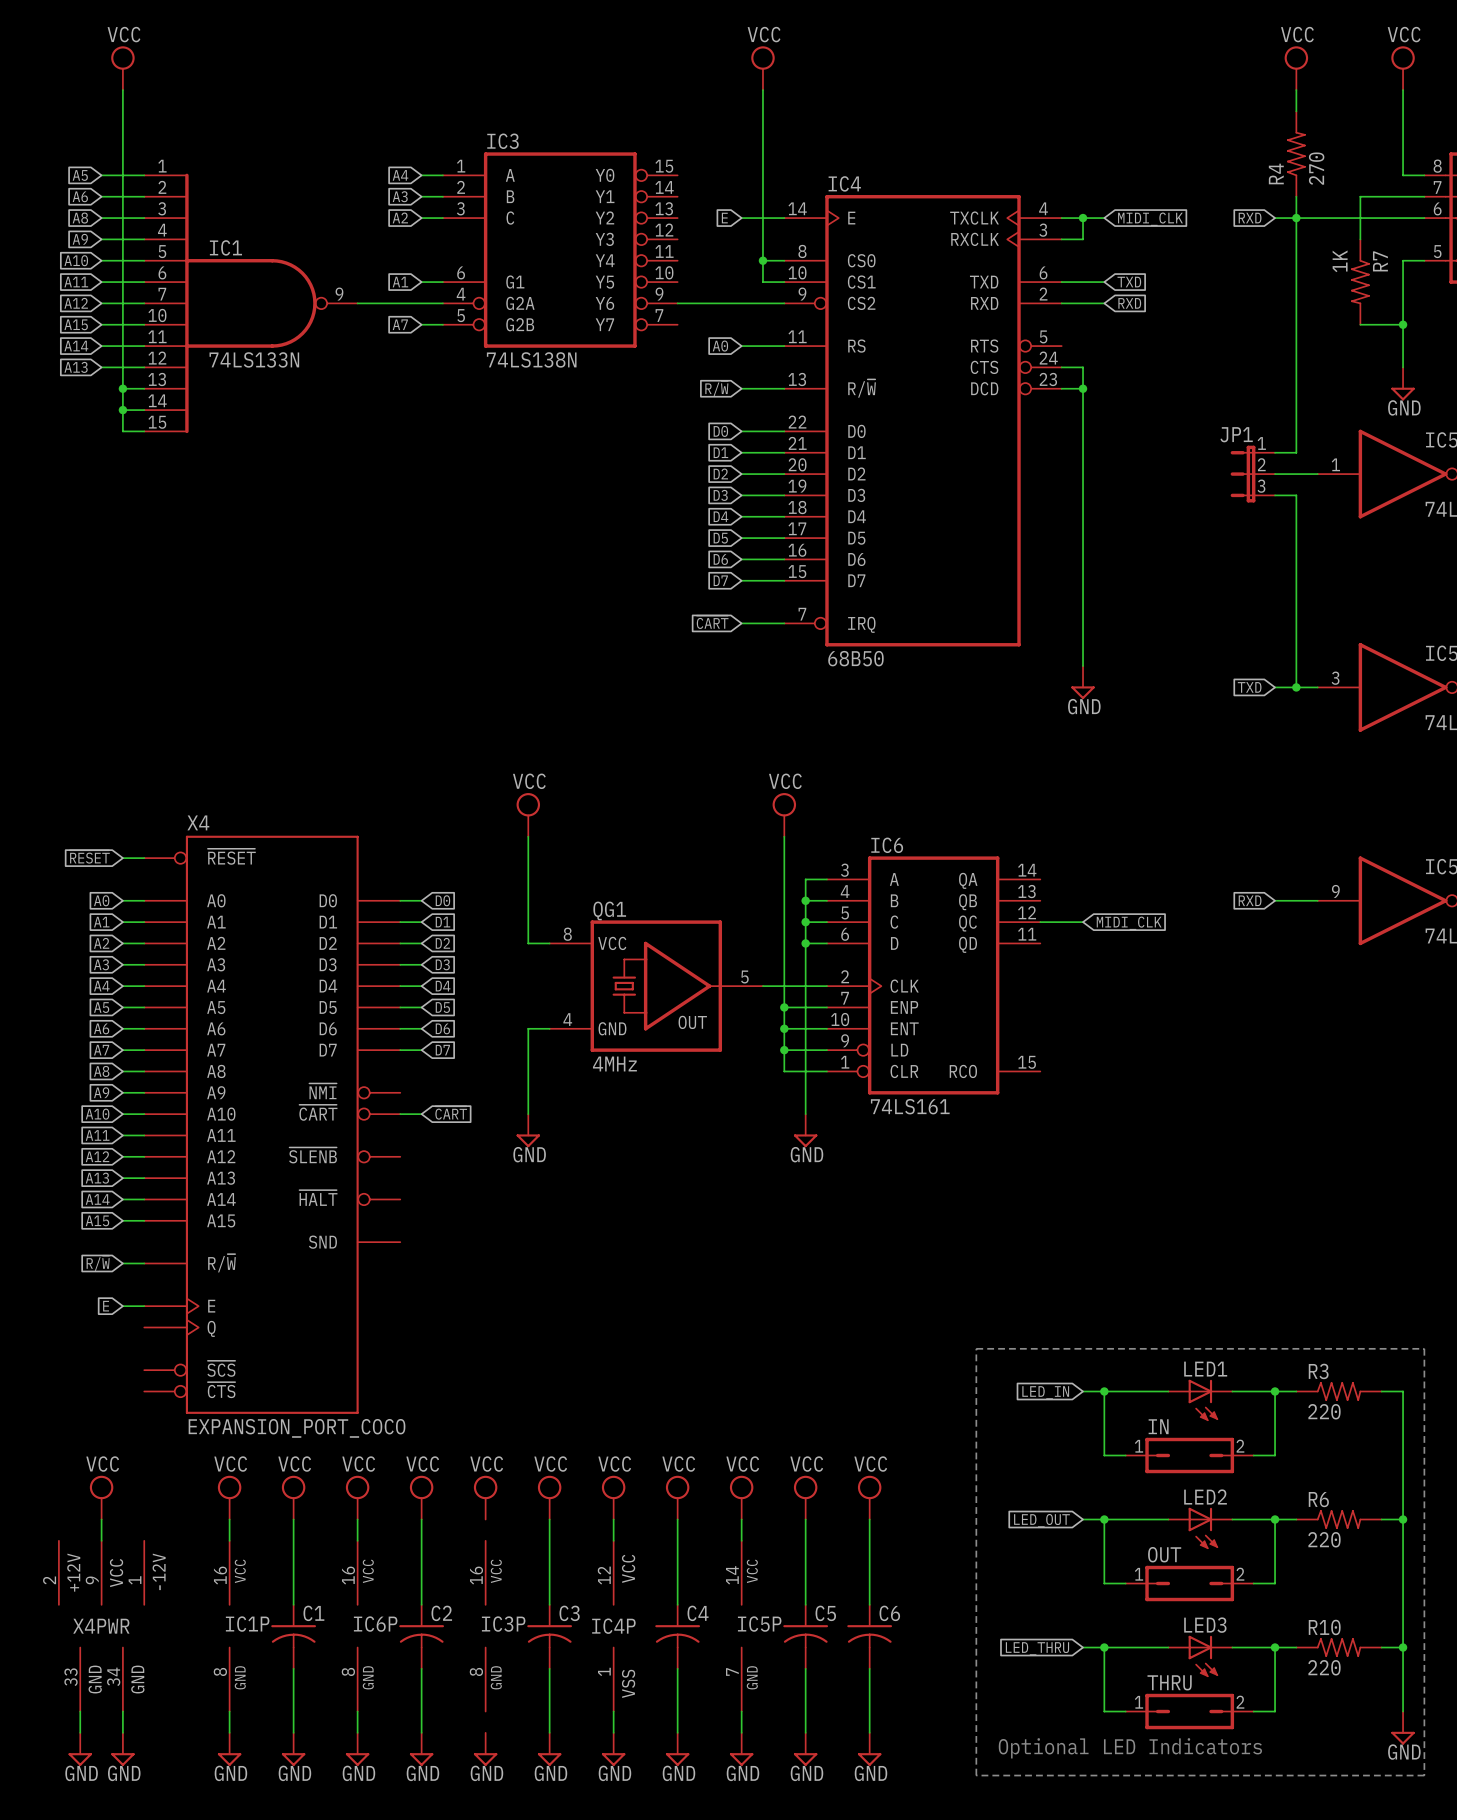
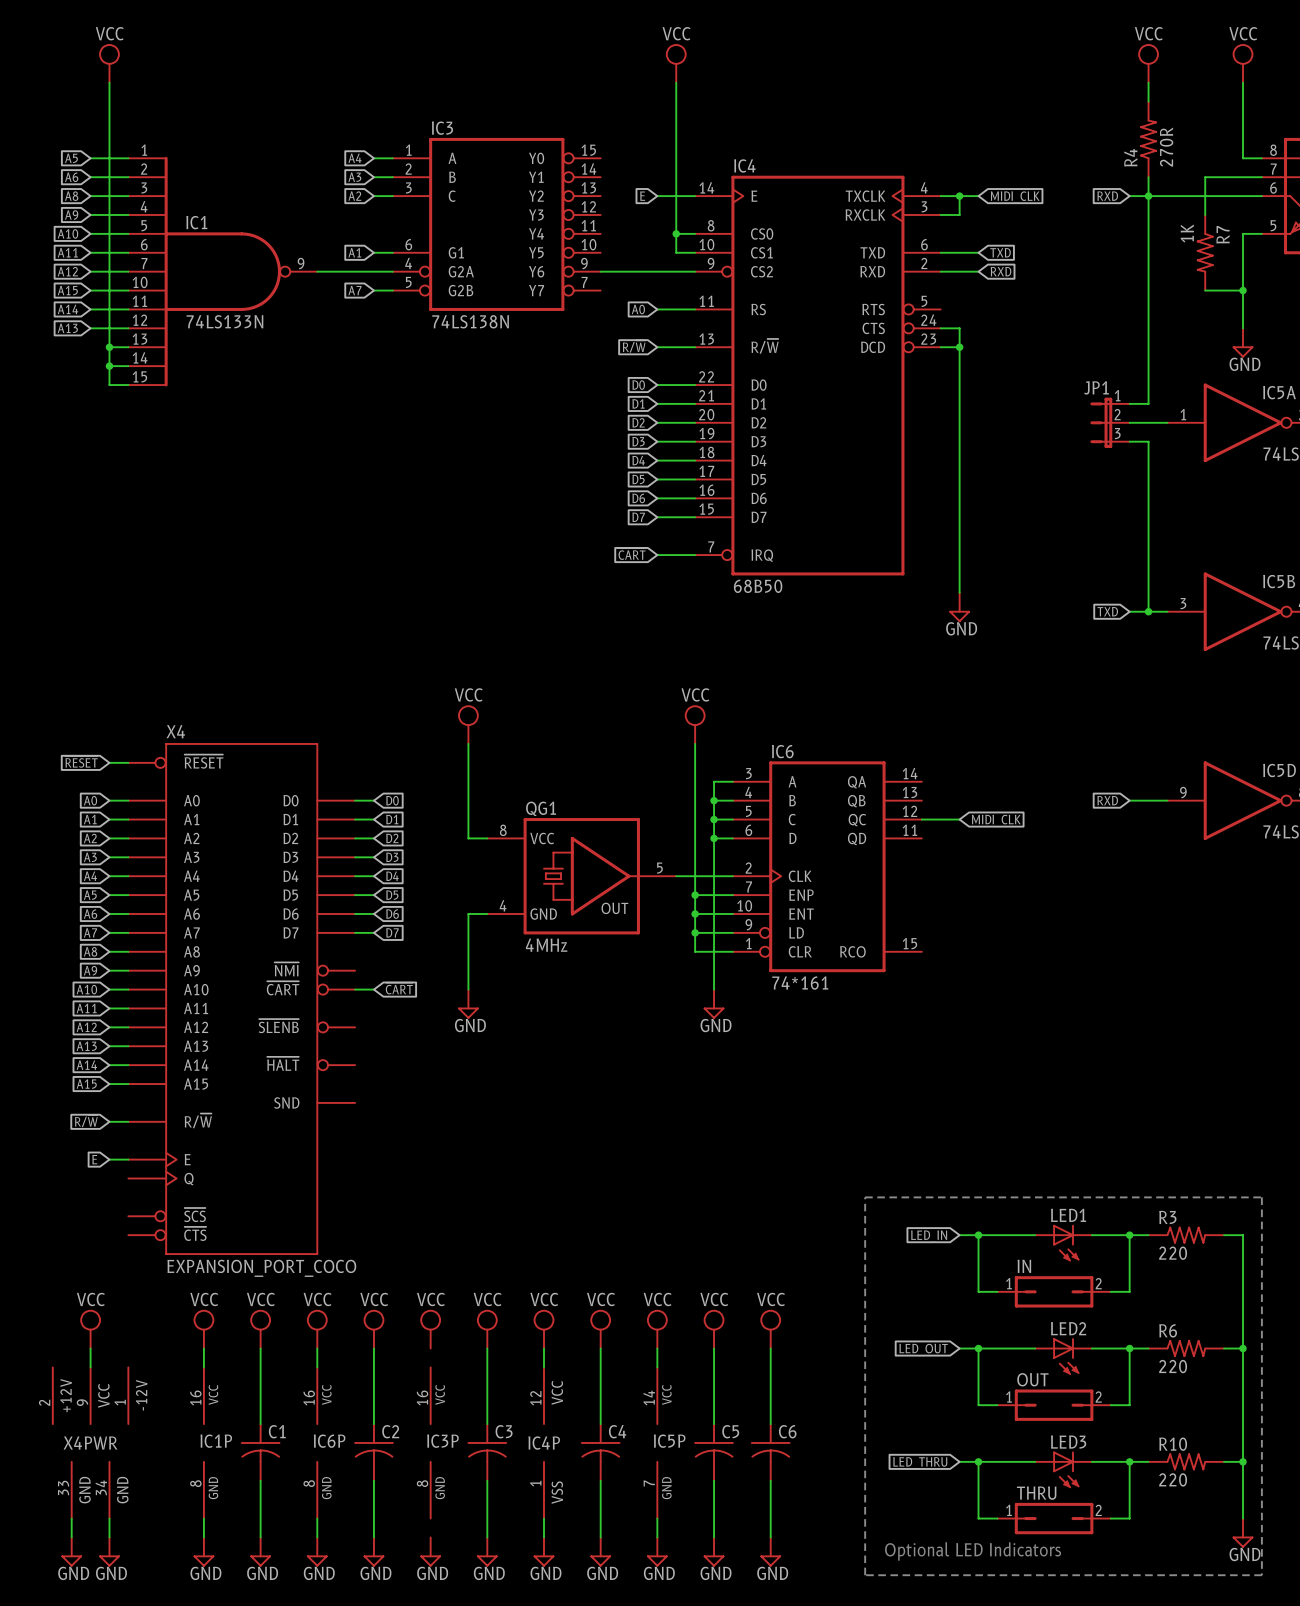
R4 value: 270 (1316, 168) -> 270R (1166, 147)
IC6 value: 74LS161 (910, 1106) -> 74*161 (800, 983)

